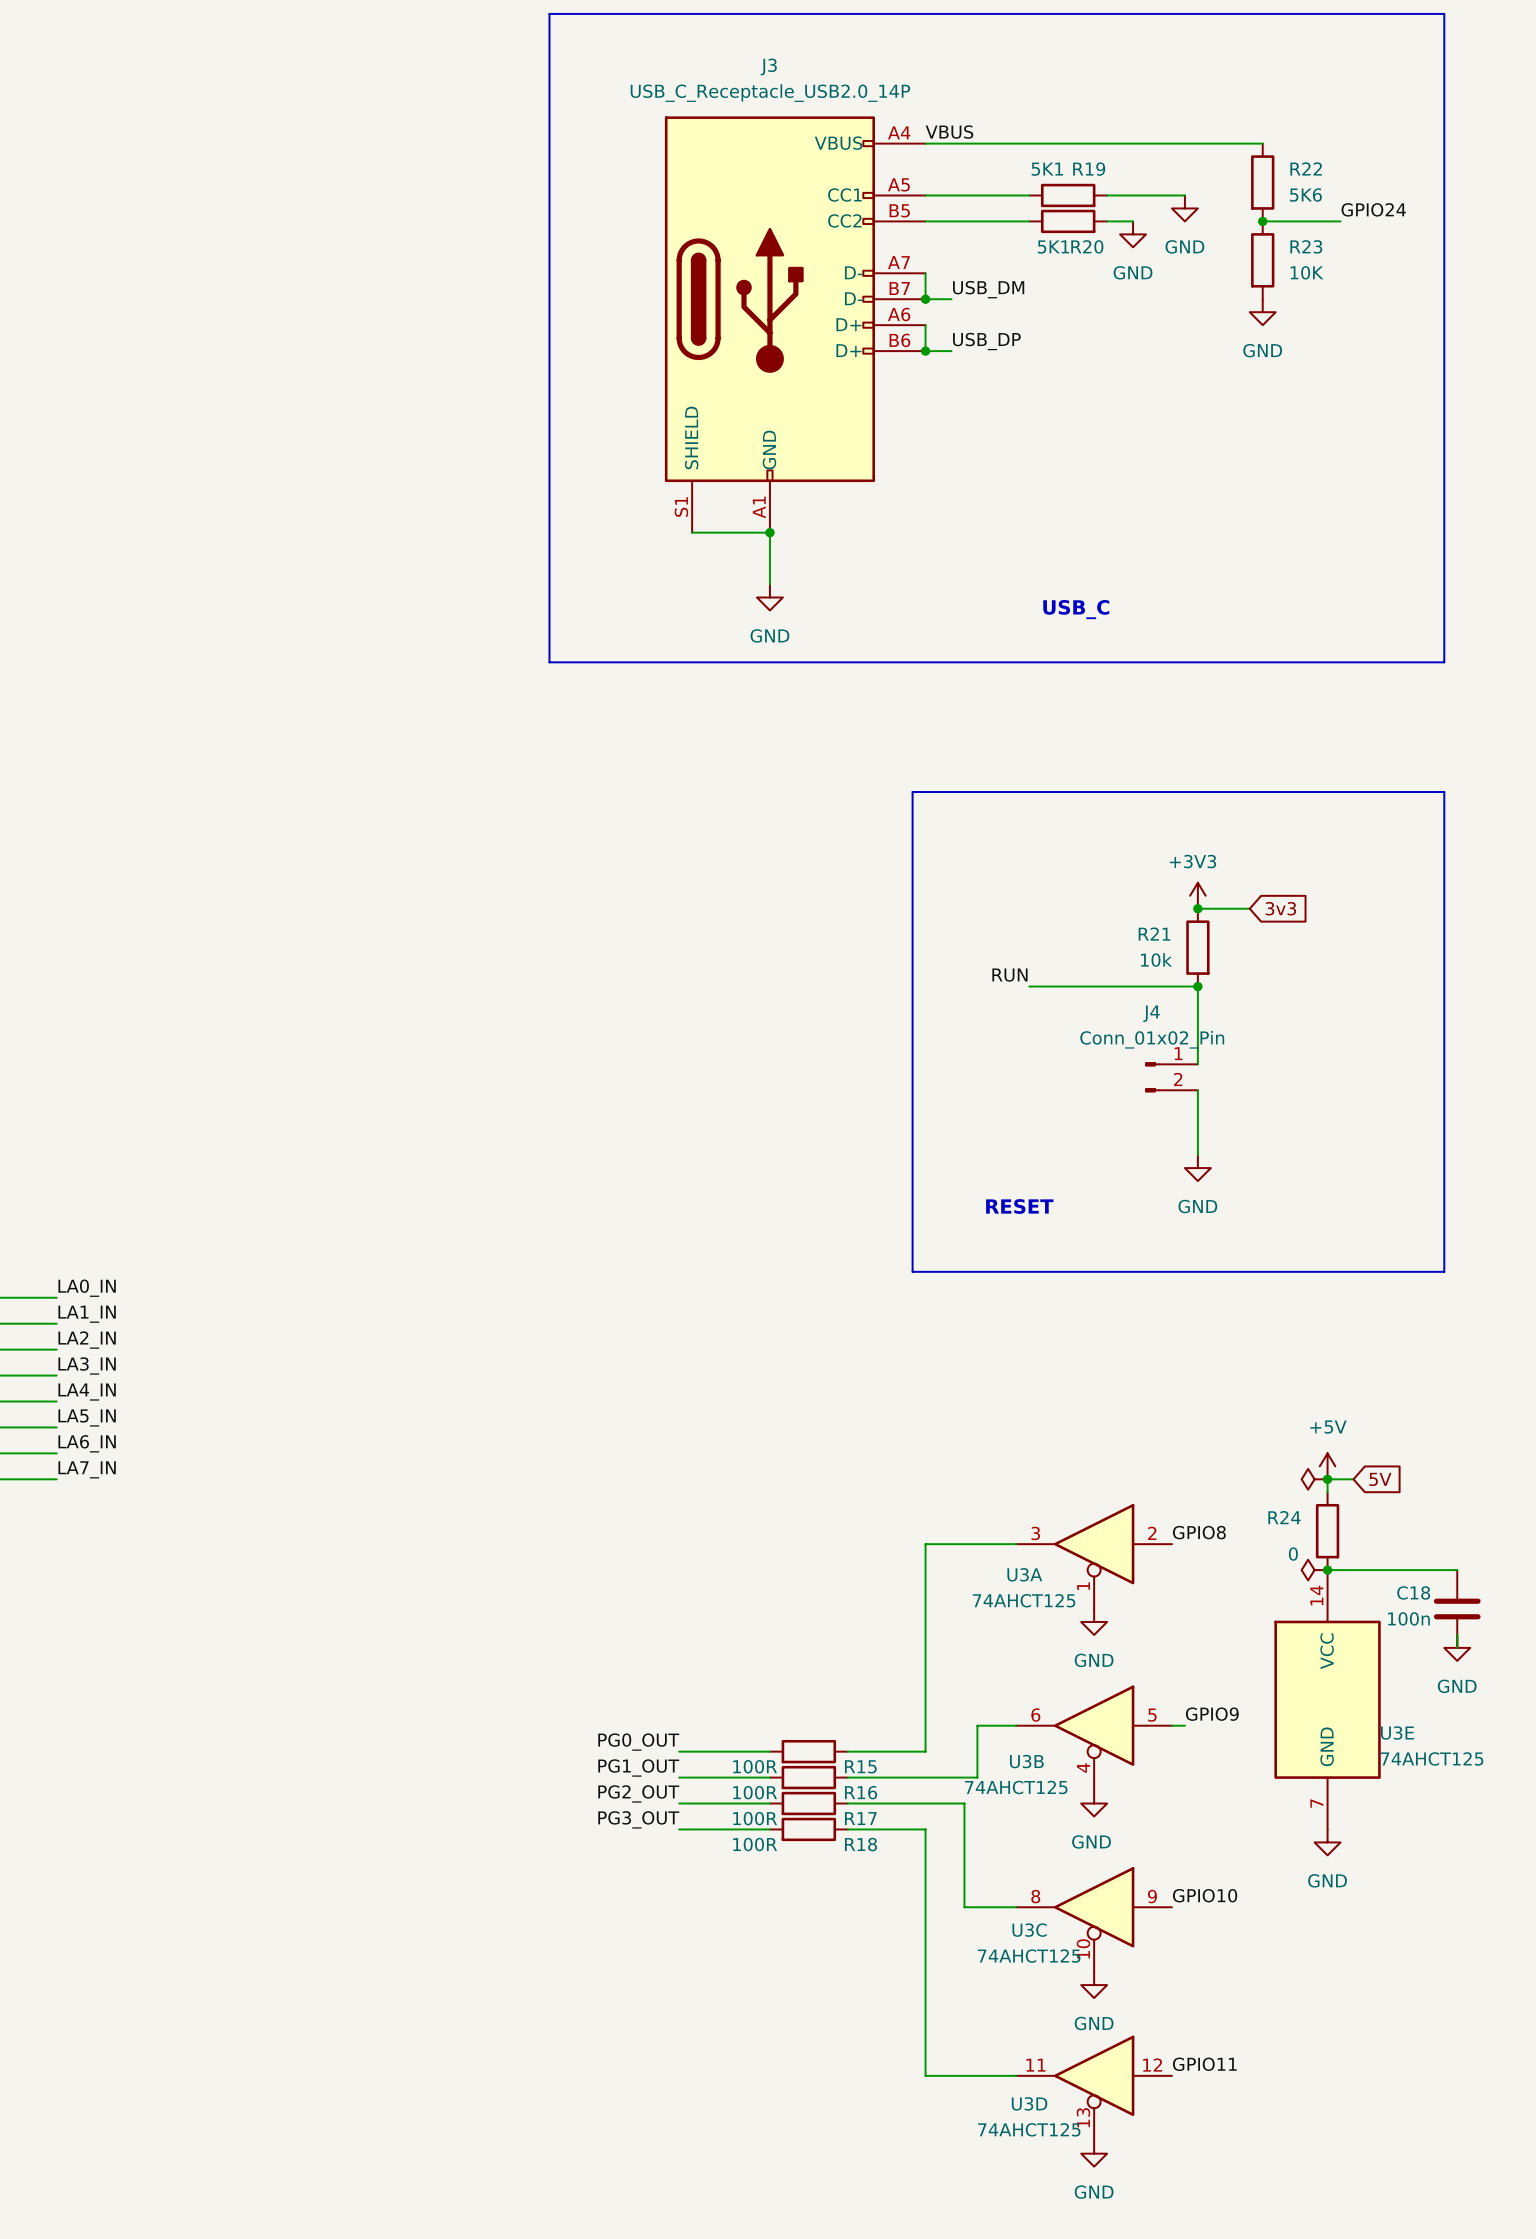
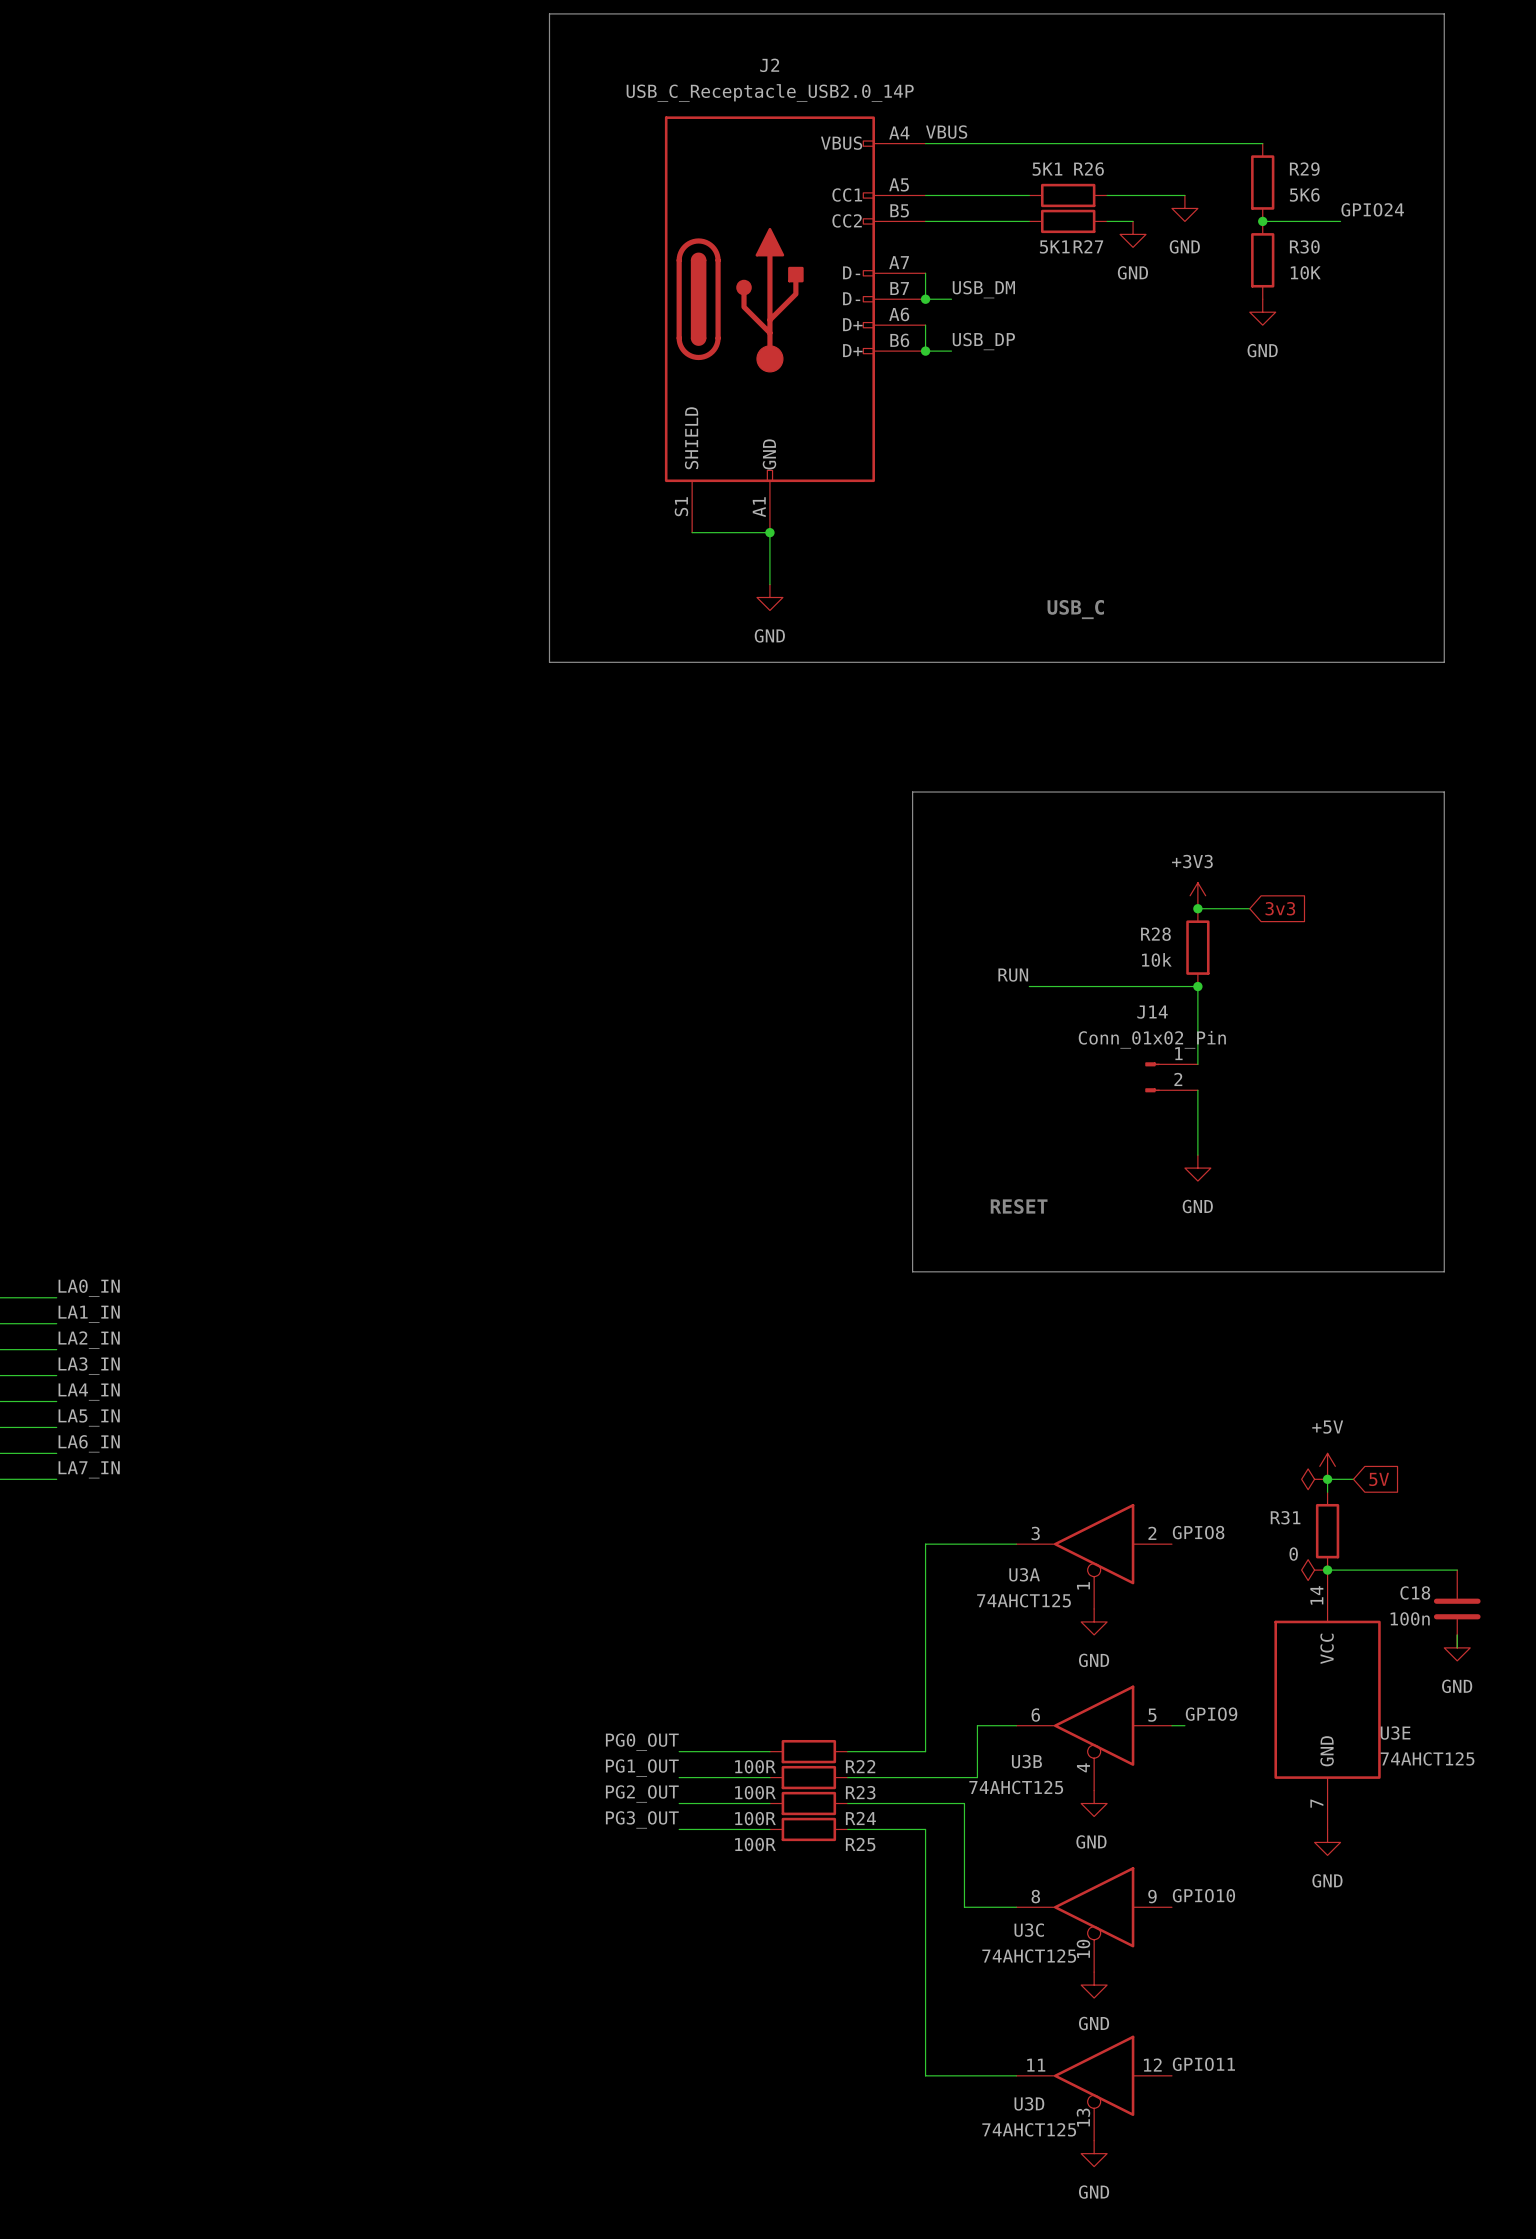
J3 name: J3 (768, 66) -> J2 (769, 65)
R22 name: R22 (1306, 168) -> R29 (1304, 169)
R19 name: R19 (1089, 169) -> R26 (1089, 169)
R20 name: R20 (1087, 246) -> R27 (1088, 246)
R23 name: R23 (1306, 246) -> R30 (1304, 246)
R21 name: R21 (1154, 934) -> R28 (1155, 934)
J4 name: J4 (1151, 1013) -> J14 (1152, 1012)
R24 name: R24 (1284, 1517) -> R31 (1285, 1517)
R15 name: R15 (860, 1766) -> R22 (860, 1766)
R16 name: R16 (861, 1792) -> R23 (860, 1792)
R17 name: R17 (860, 1818) -> R24 (860, 1818)
R18 name: R18 (860, 1844) -> R25 (860, 1844)

